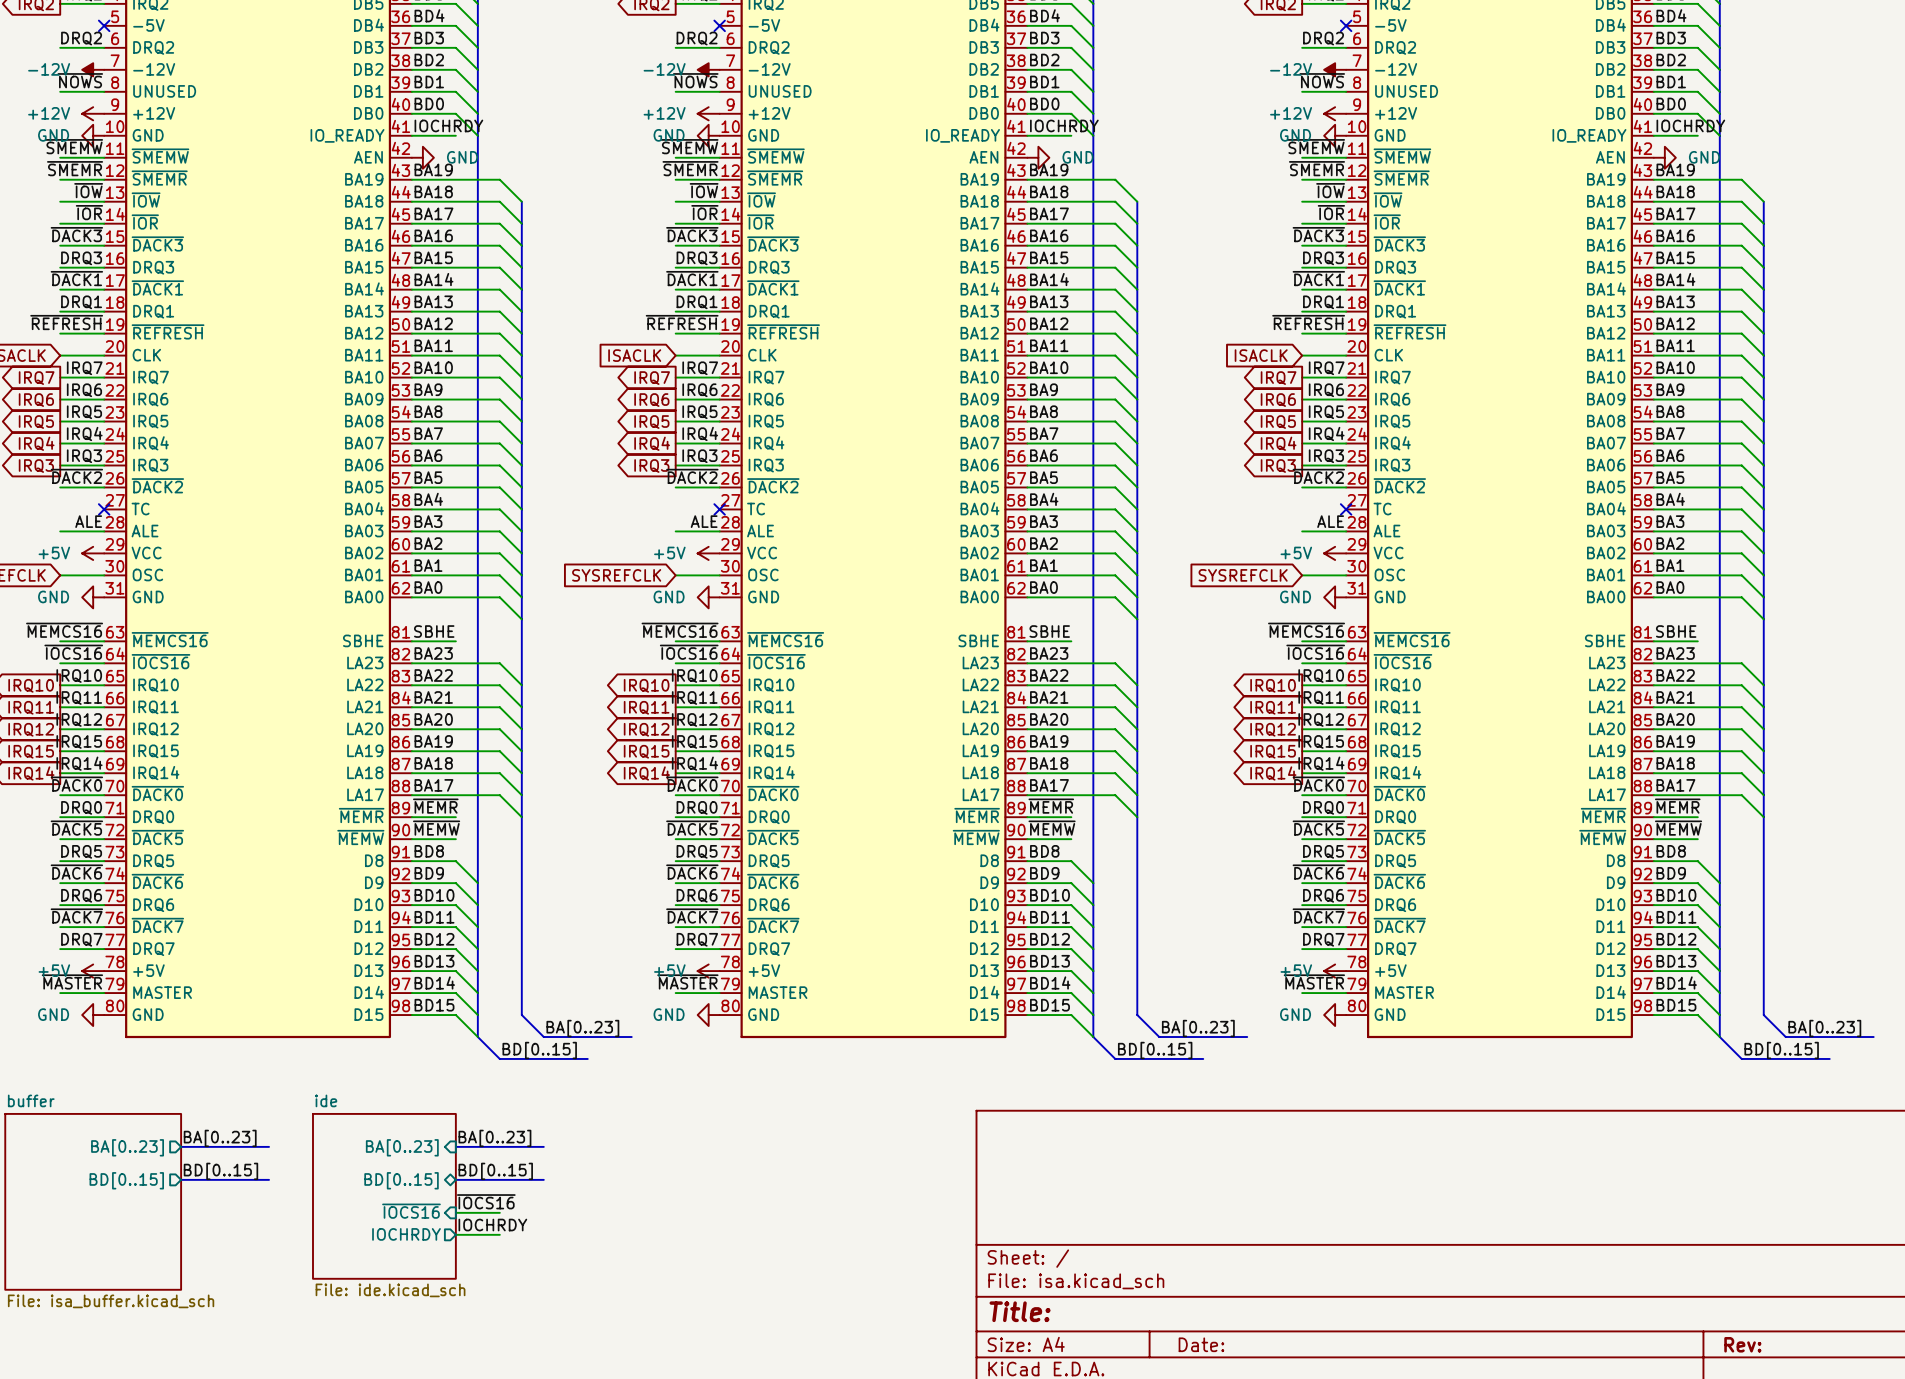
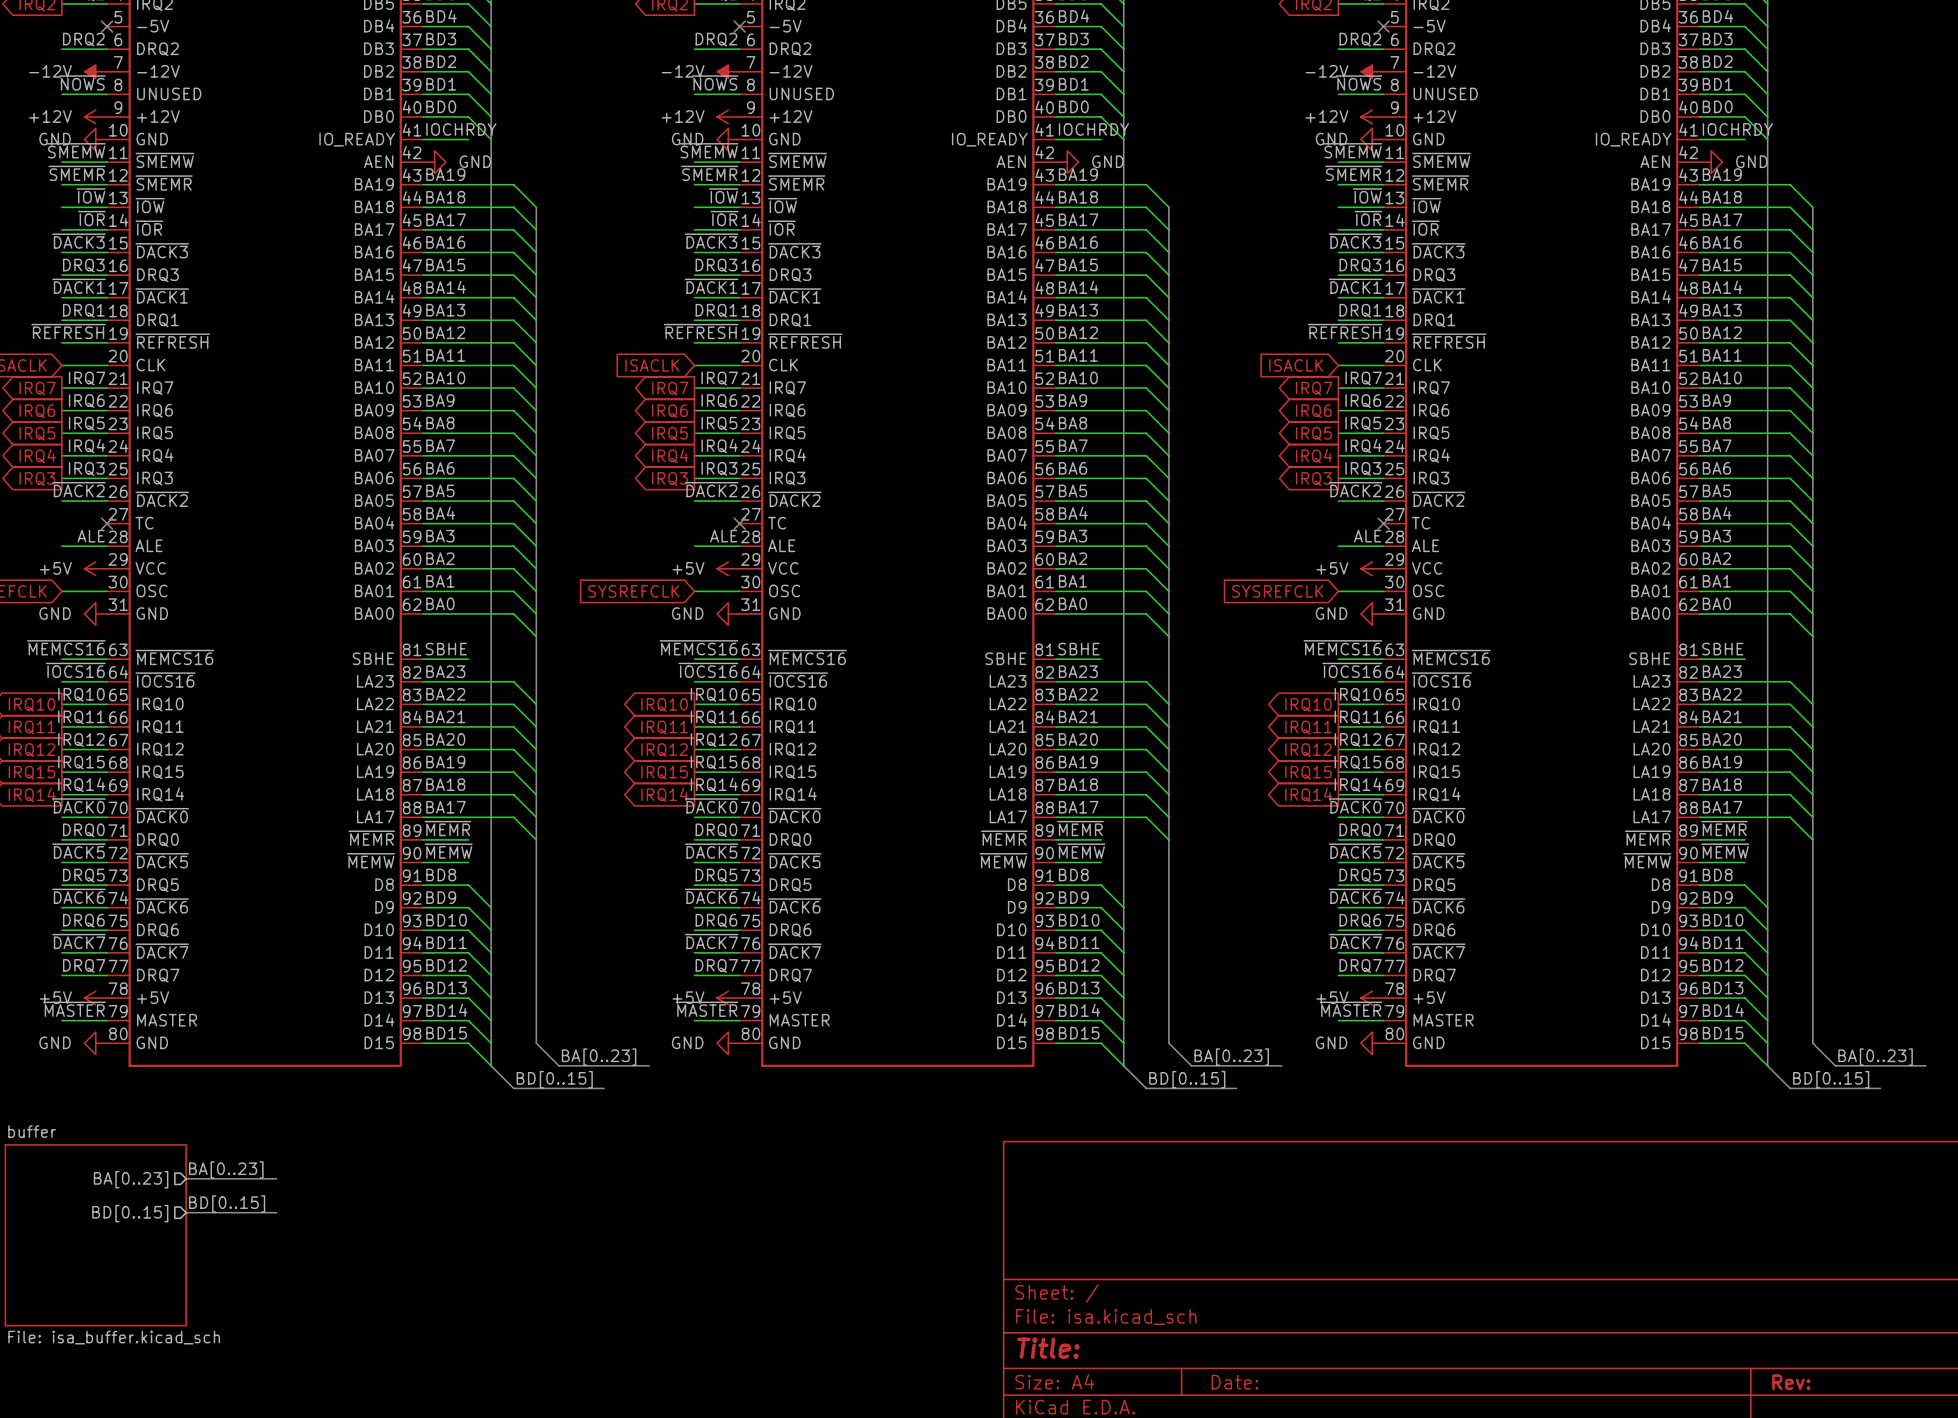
label: BA[0..23] (494, 1138) -> none
bus: (455, 1146) (543, 1146) -> none
sheet pin: BA[0..23] (402, 1147) -> none
label: BD[0..15] (495, 1171) -> none
bus: (455, 1179) (543, 1179) -> none
sheet pin: BD[0..15] (401, 1180) -> none
sheet ide: File: ide.kicad_sch (384, 1196) -> none
label: ~{IOCS16} (486, 1201) -> none
sheet pin: ~{IOCS16} (411, 1211) -> none
wire: (455, 1212) (499, 1212) -> none
label: IOCHRDY (492, 1225) -> none
sheet pin: IOCHRDY (406, 1234) -> none
wire: (455, 1234) (499, 1234) -> none

